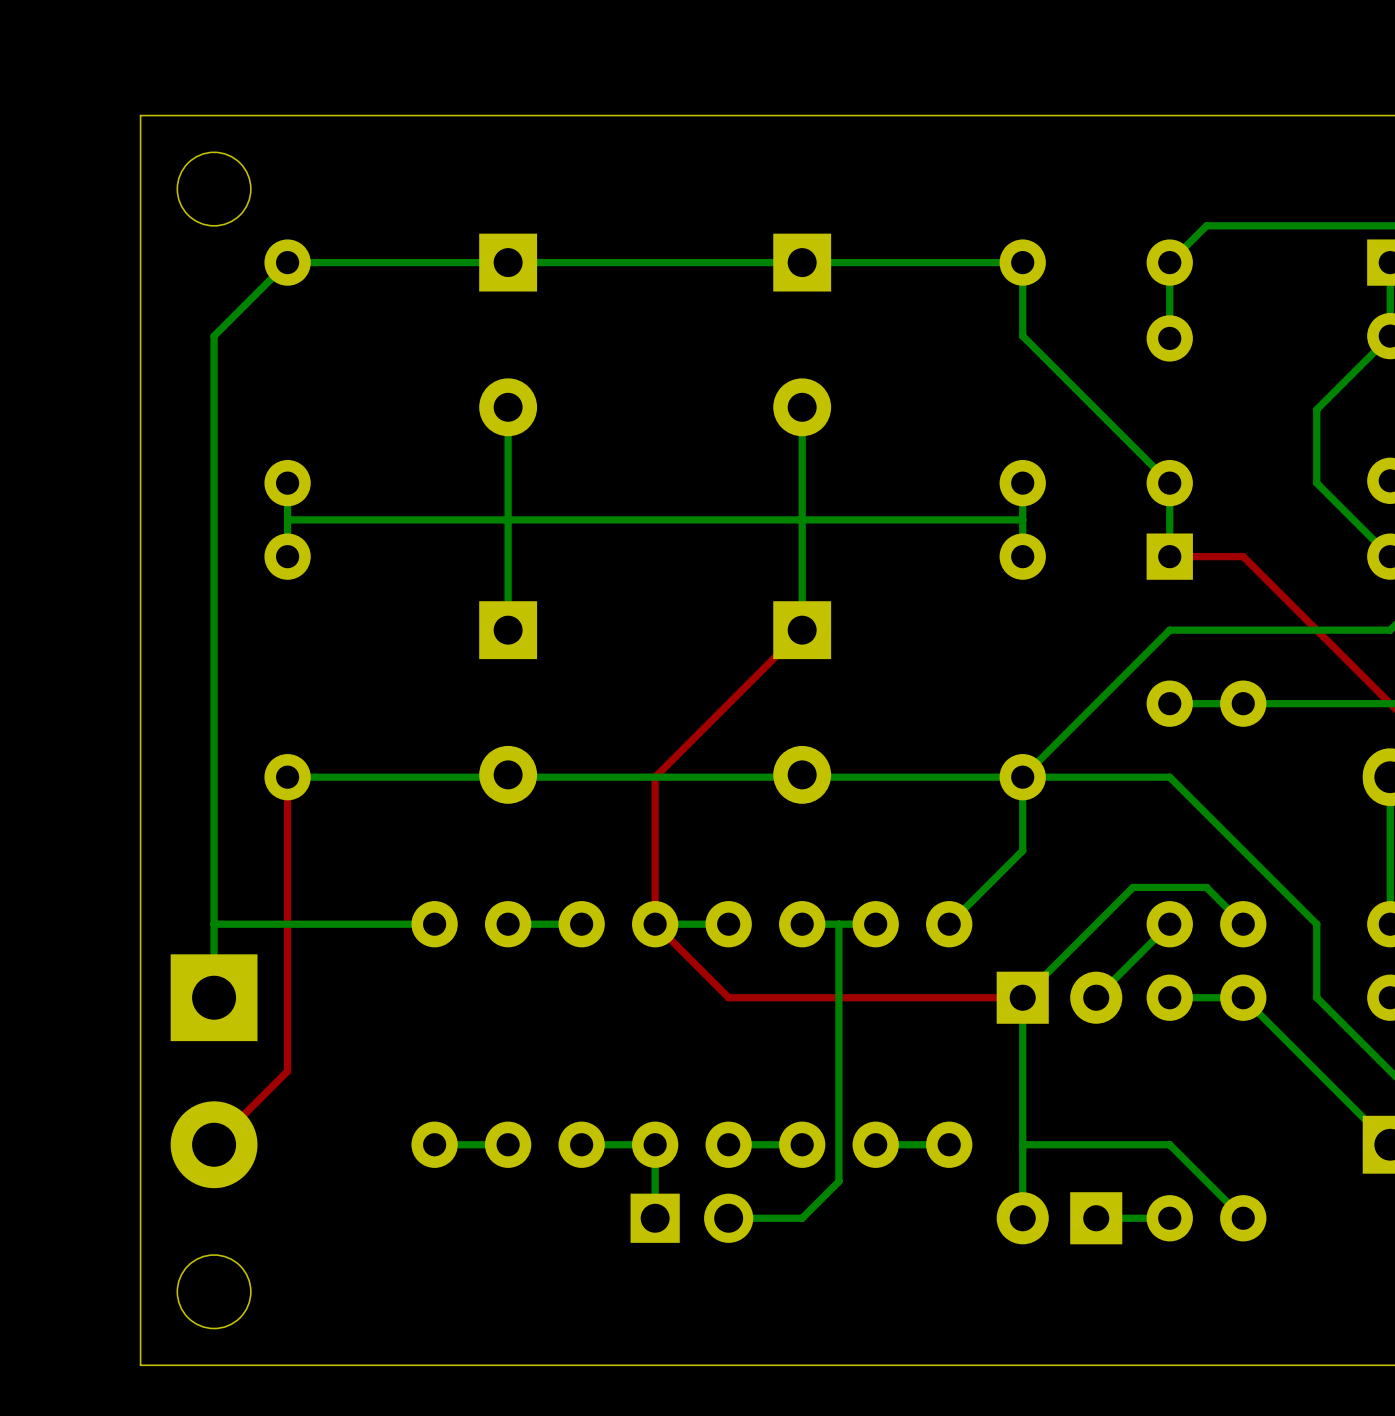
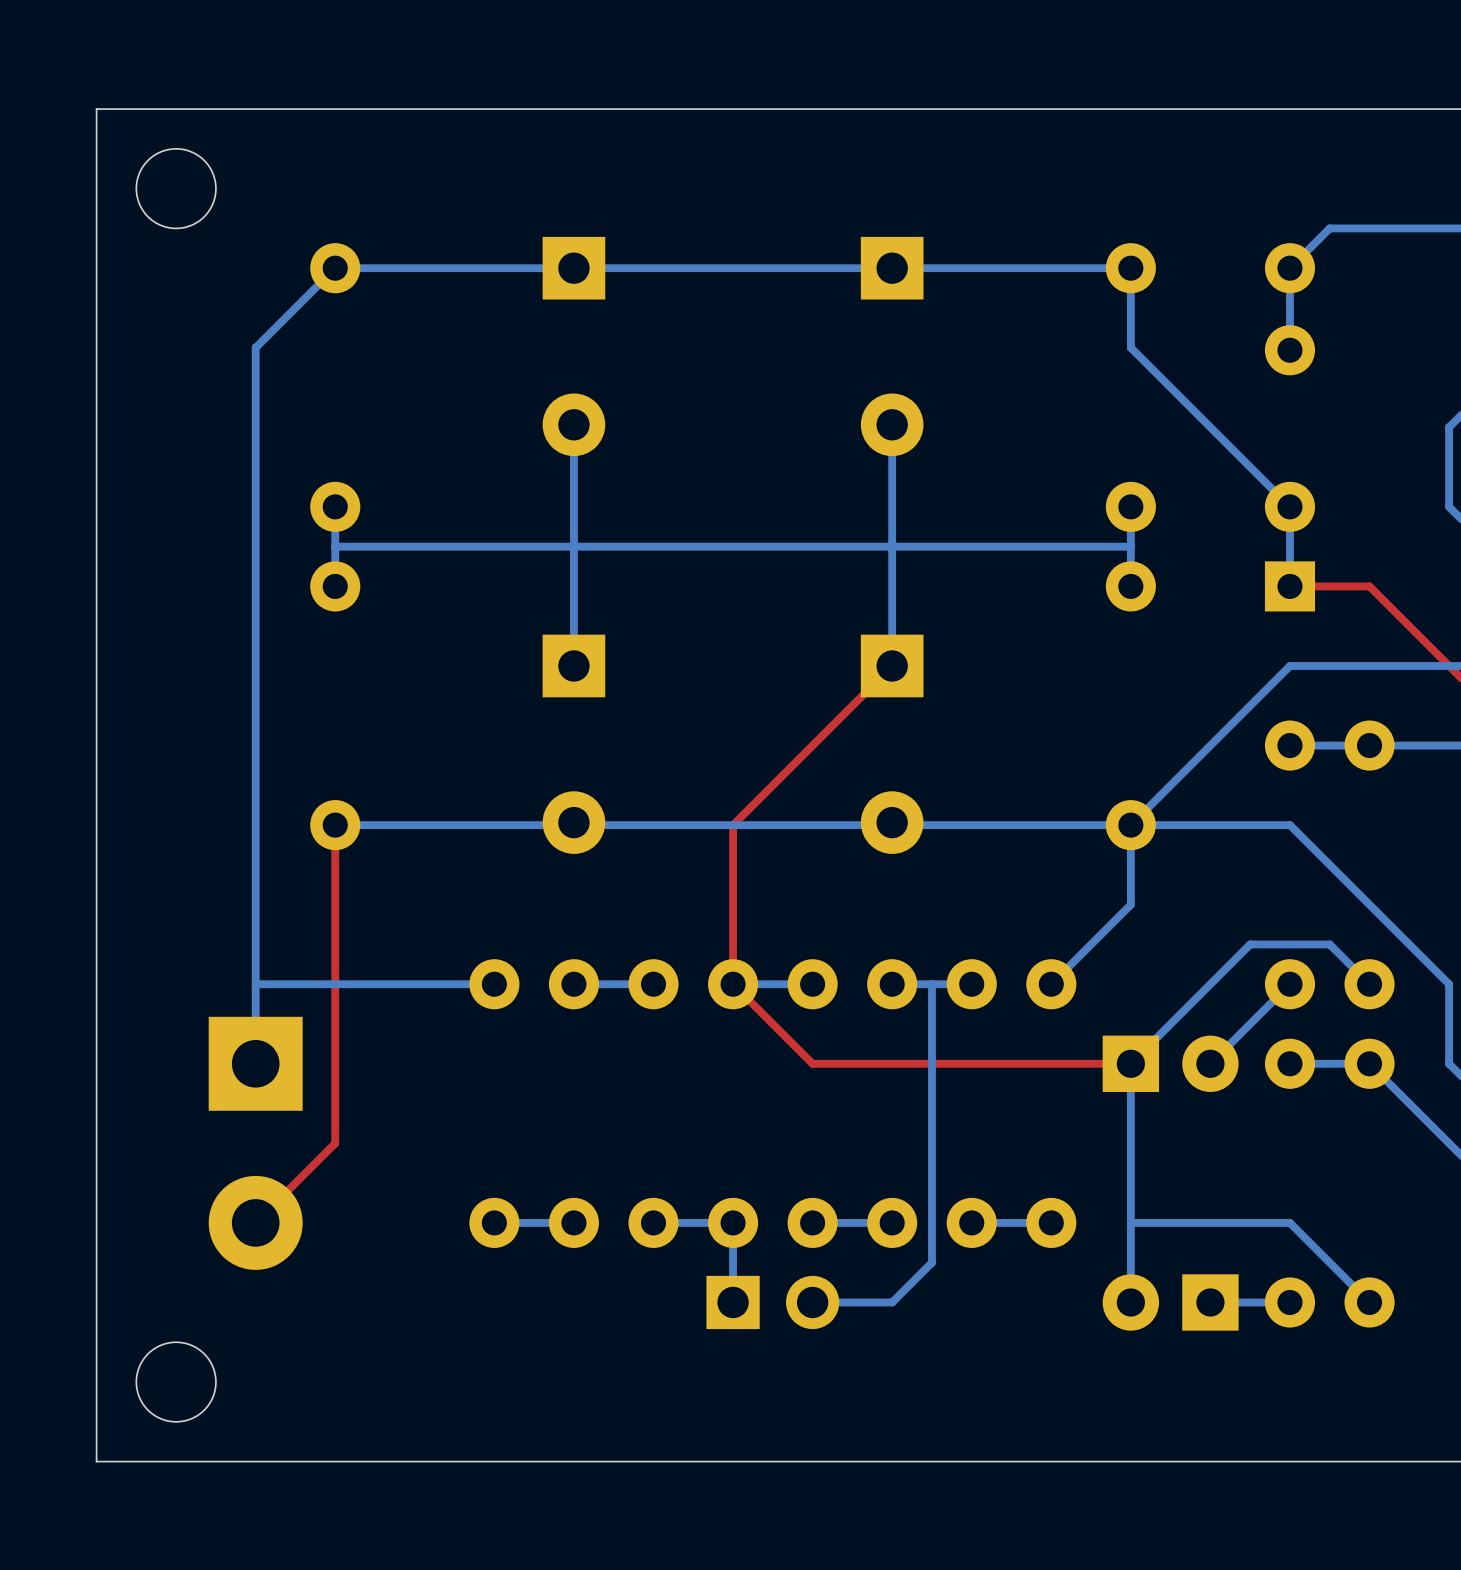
board edge: (140, 115) (140, 1365) -> (176, 109) (96, 109) (96, 1461) (176, 1461)
round board edge position: (214, 189) -> (176, 188)
round board edge position: (214, 1291) -> (176, 1382)

